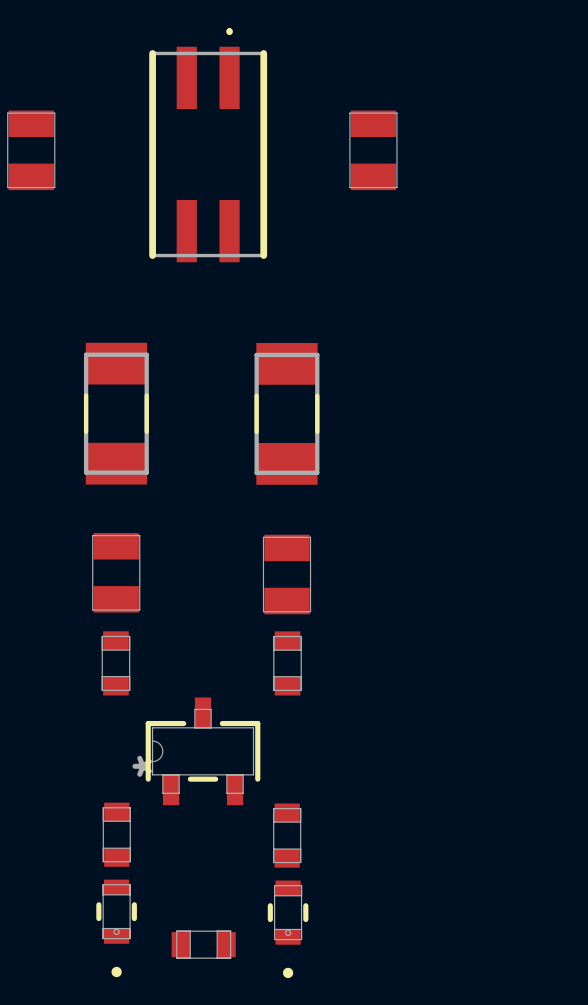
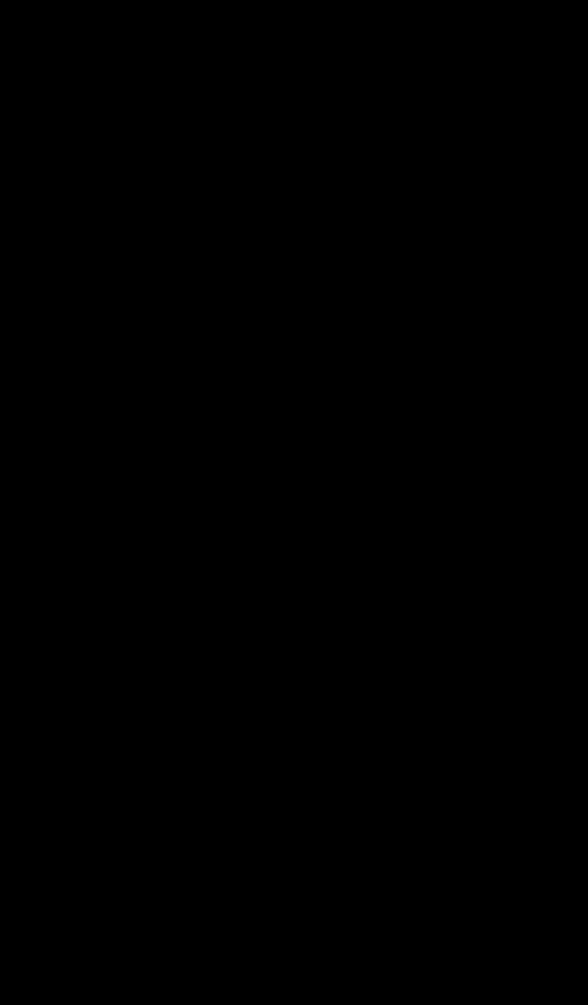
part: (208, 145) -> none
part: (31, 150) -> none
part: (373, 150) -> none
part: (116, 413) -> none
part: (286, 413) -> none
part: (116, 572) -> none
part: (286, 574) -> none
part: (115, 663) -> none
part: (287, 663) -> none
part: (203, 751) -> none
part: (116, 834) -> none
part: (287, 835) -> none
part: (116, 928) -> none
part: (288, 929) -> none
part: (203, 944) -> none

